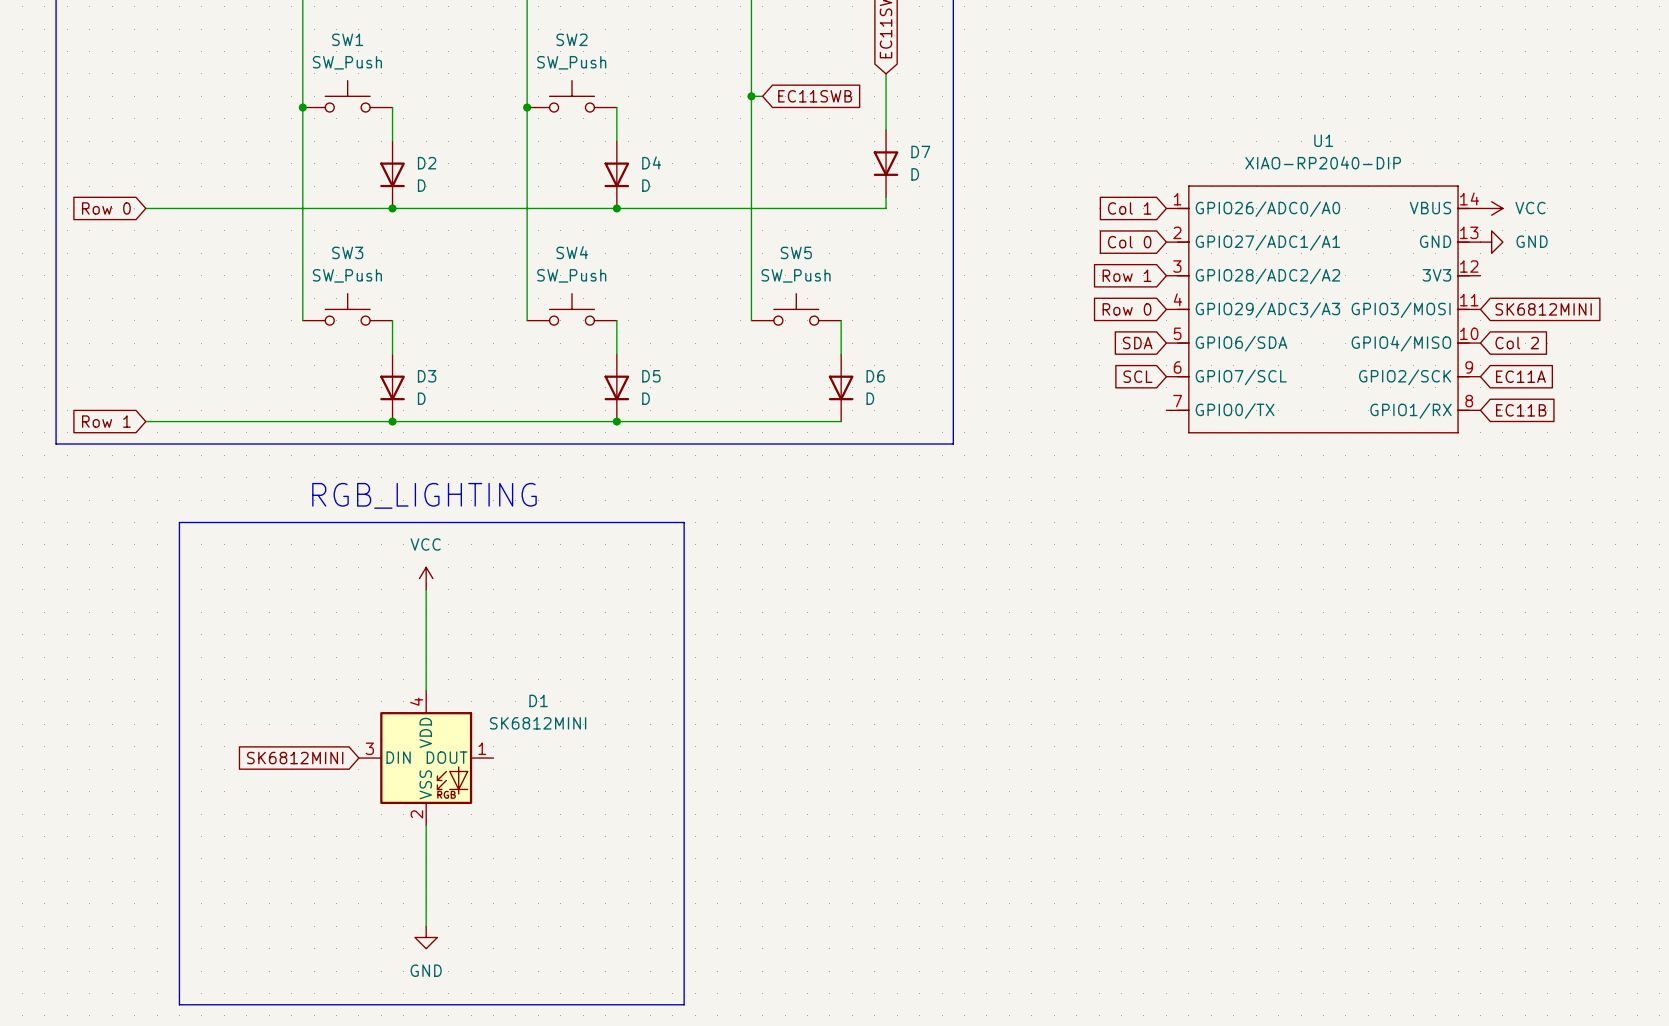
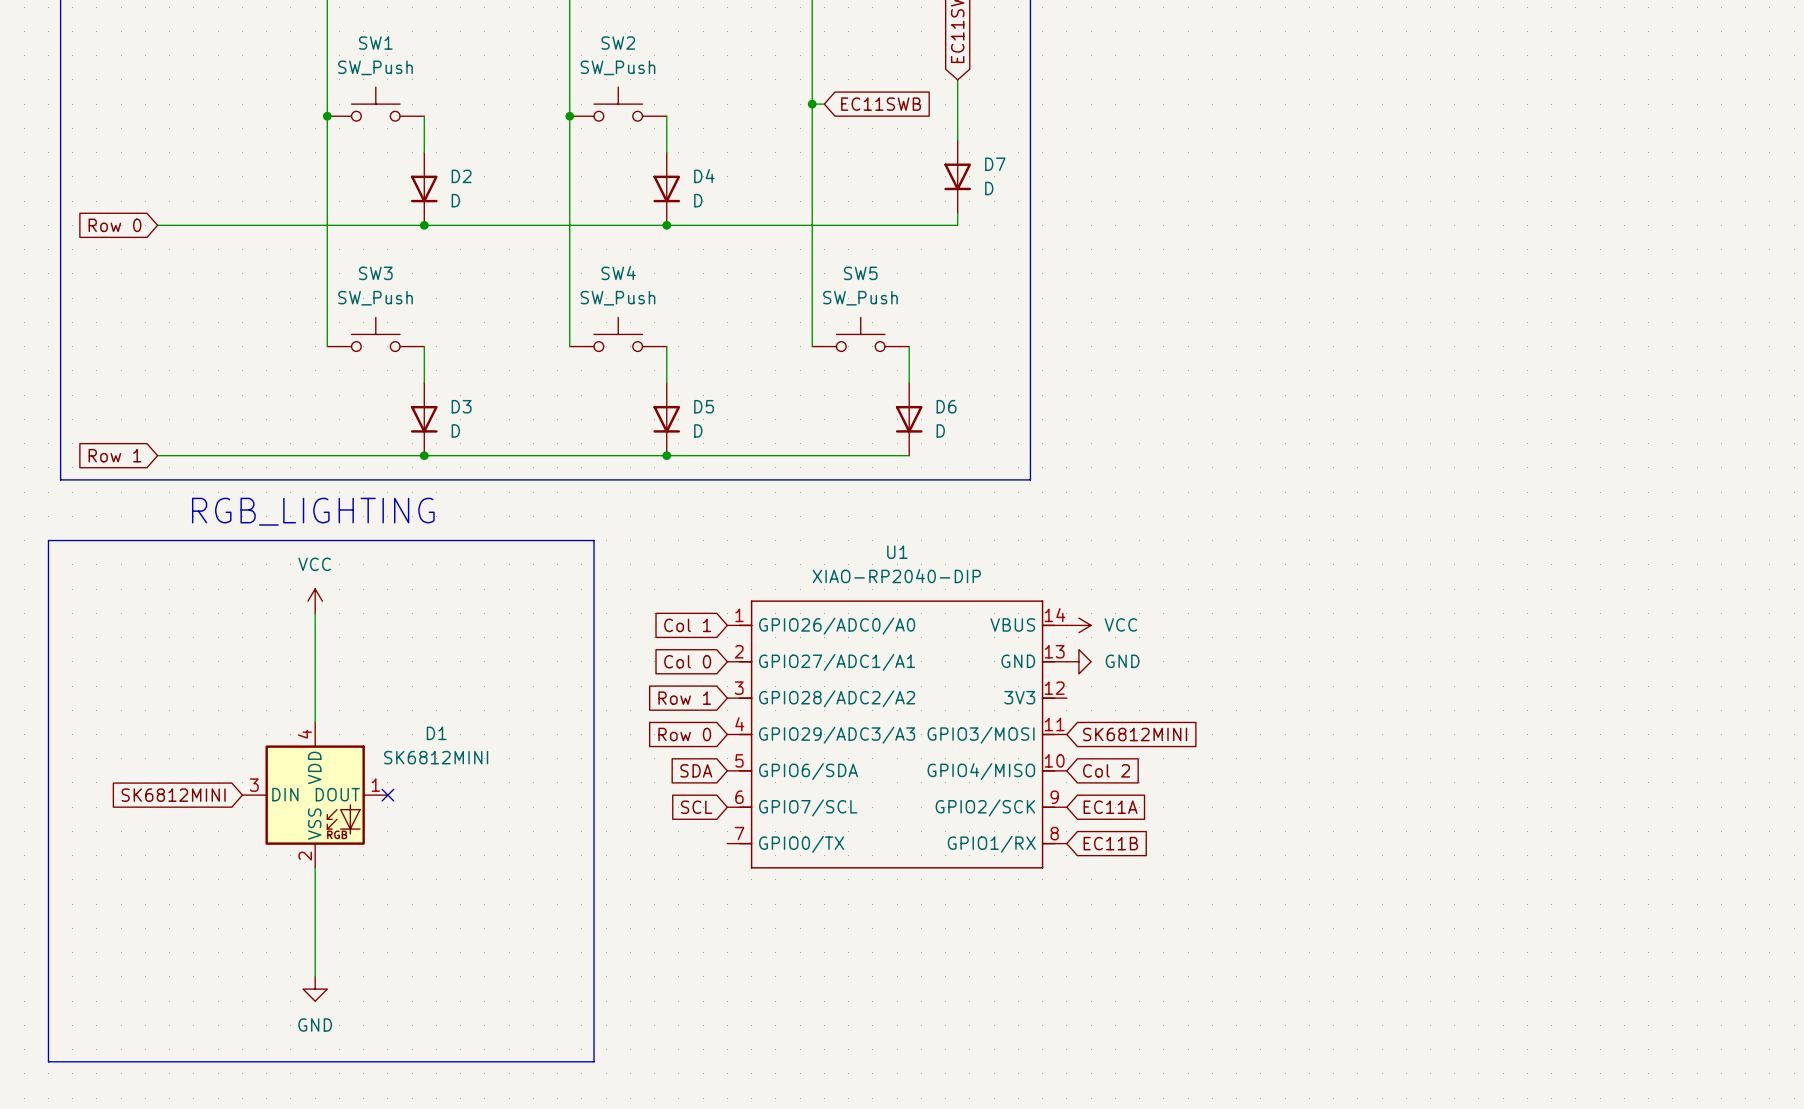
global label: Col 1 (1129, 208) -> none
power symbol: VCC (1491, 208) -> none
global label: Col 0 (1129, 242) -> none
power symbol: GND (1491, 242) -> none
global label: Row 1 (1127, 275) -> none
global label: Row 0 (1127, 309) -> none
U1 position: (1323, 309) -> (897, 734)
global label: SK6812MINI (1543, 309) -> none
global label: SDA (1137, 343) -> none
global label: Col 2 (1517, 343) -> none
global label: SCL (1137, 376) -> none
global label: EC11A (1520, 376) -> none
global label: EC11B (1521, 410) -> none
text position: RGB_LIGHTING (424, 495) -> RGB_LIGHTING (313, 511)
line: (179, 522) (684, 522) (684, 1004) (179, 1004) (179, 522) -> (48, 540) (594, 540) (594, 1061) (48, 1061) (48, 540)
power symbol position: VCC (426, 578) -> VCC (315, 601)
global label: none -> Col 1 (687, 625)
power symbol: none -> VCC (1078, 625)
wire: (426, 589) (426, 690) -> (315, 613) (315, 722)
global label: none -> Col 0 (687, 661)
power symbol: none -> GND (1078, 661)
global label: none -> Row 1 (684, 698)
global label: none -> Row 0 (684, 734)
global label: none -> SK6812MINI (1135, 734)
global label: none -> SDA (696, 770)
global label: none -> Col 2 (1106, 770)
no-connect mark: none -> (387, 795)
global label: none -> SCL (696, 807)
global label: none -> EC11A (1110, 807)
global label position: SK6812MINI (295, 758) -> SK6812MINI (173, 795)
D1 position: (426, 758) -> (315, 795)
global label: none -> EC11B (1110, 843)
wire: (426, 825) (426, 926) -> (315, 867) (315, 976)
power symbol position: GND (426, 937) -> GND (315, 989)

